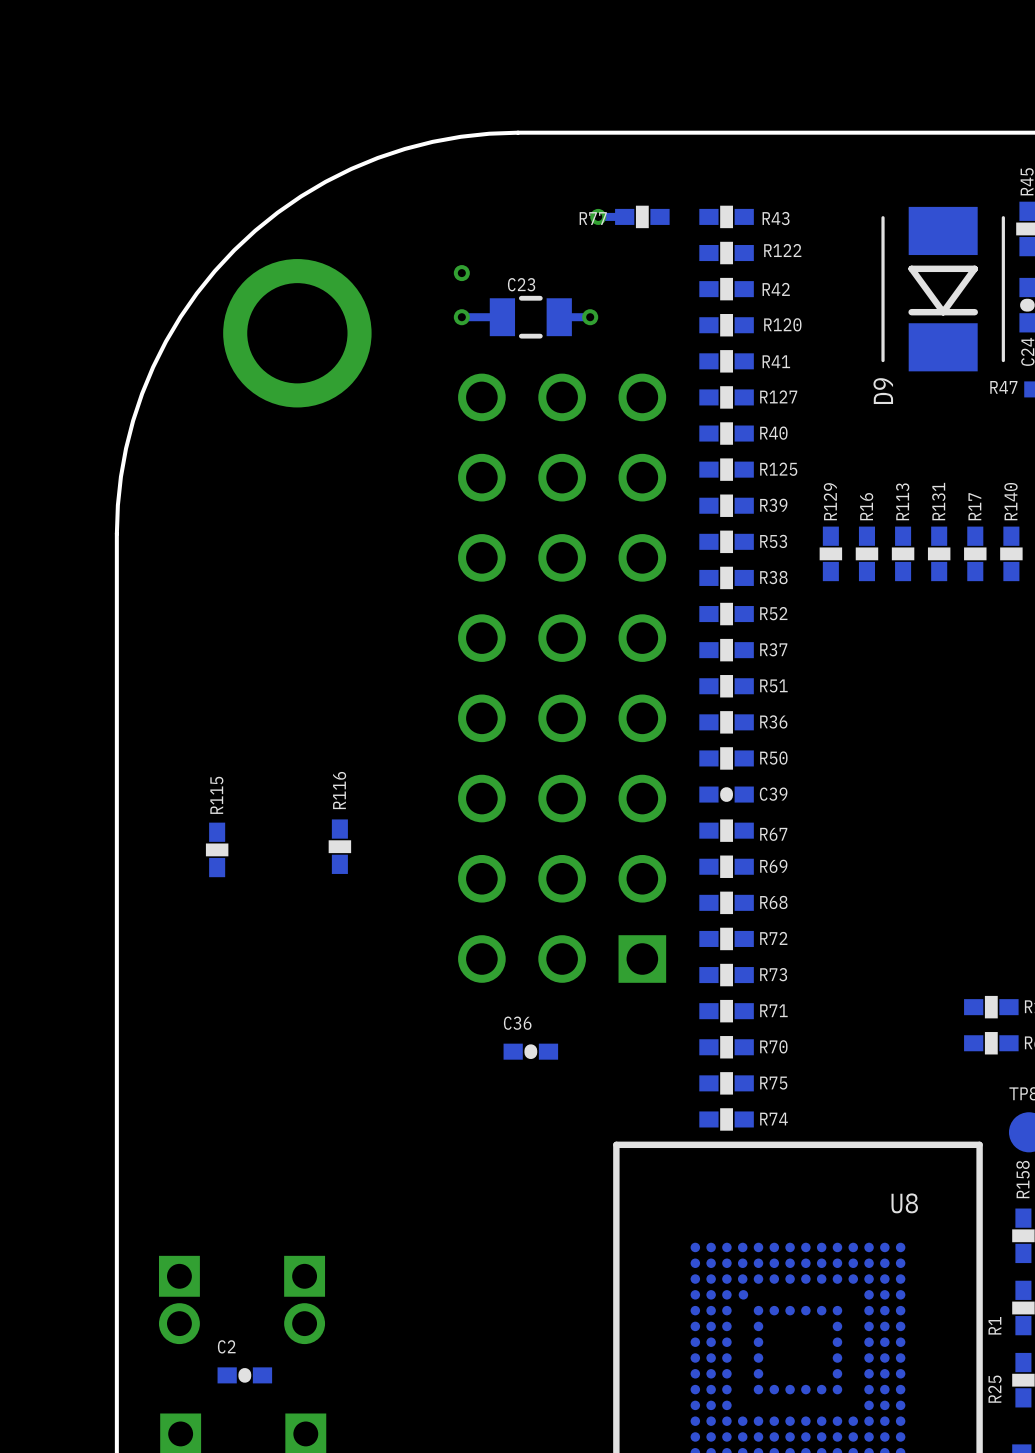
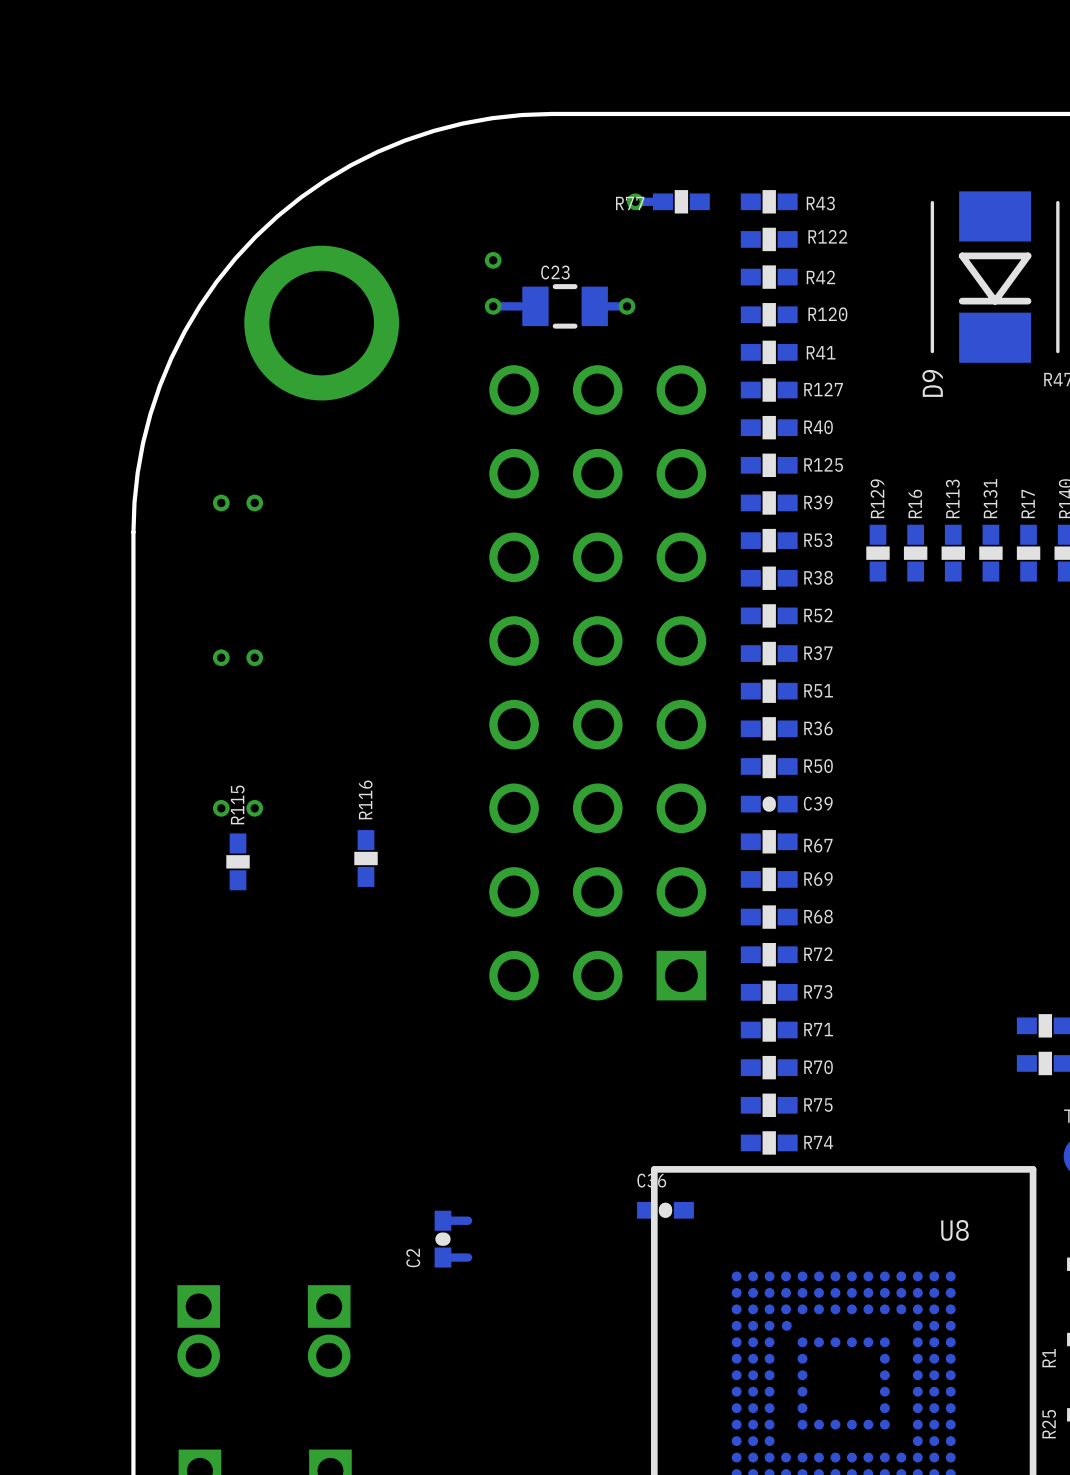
via: none -> (221, 502)
via: none -> (254, 502)
via: none -> (221, 657)
via: none -> (254, 657)
via: none -> (221, 808)
via: none -> (254, 808)
C36 position: (530, 1051) -> (665, 1210)
track: none -> (468, 1220) (442, 1220)
track: none -> (468, 1257) (442, 1257)
C2 rotation: 0° (244, 1375) -> 90° clockwise (442, 1239)
C2 position: (244, 1375) -> (442, 1239)

